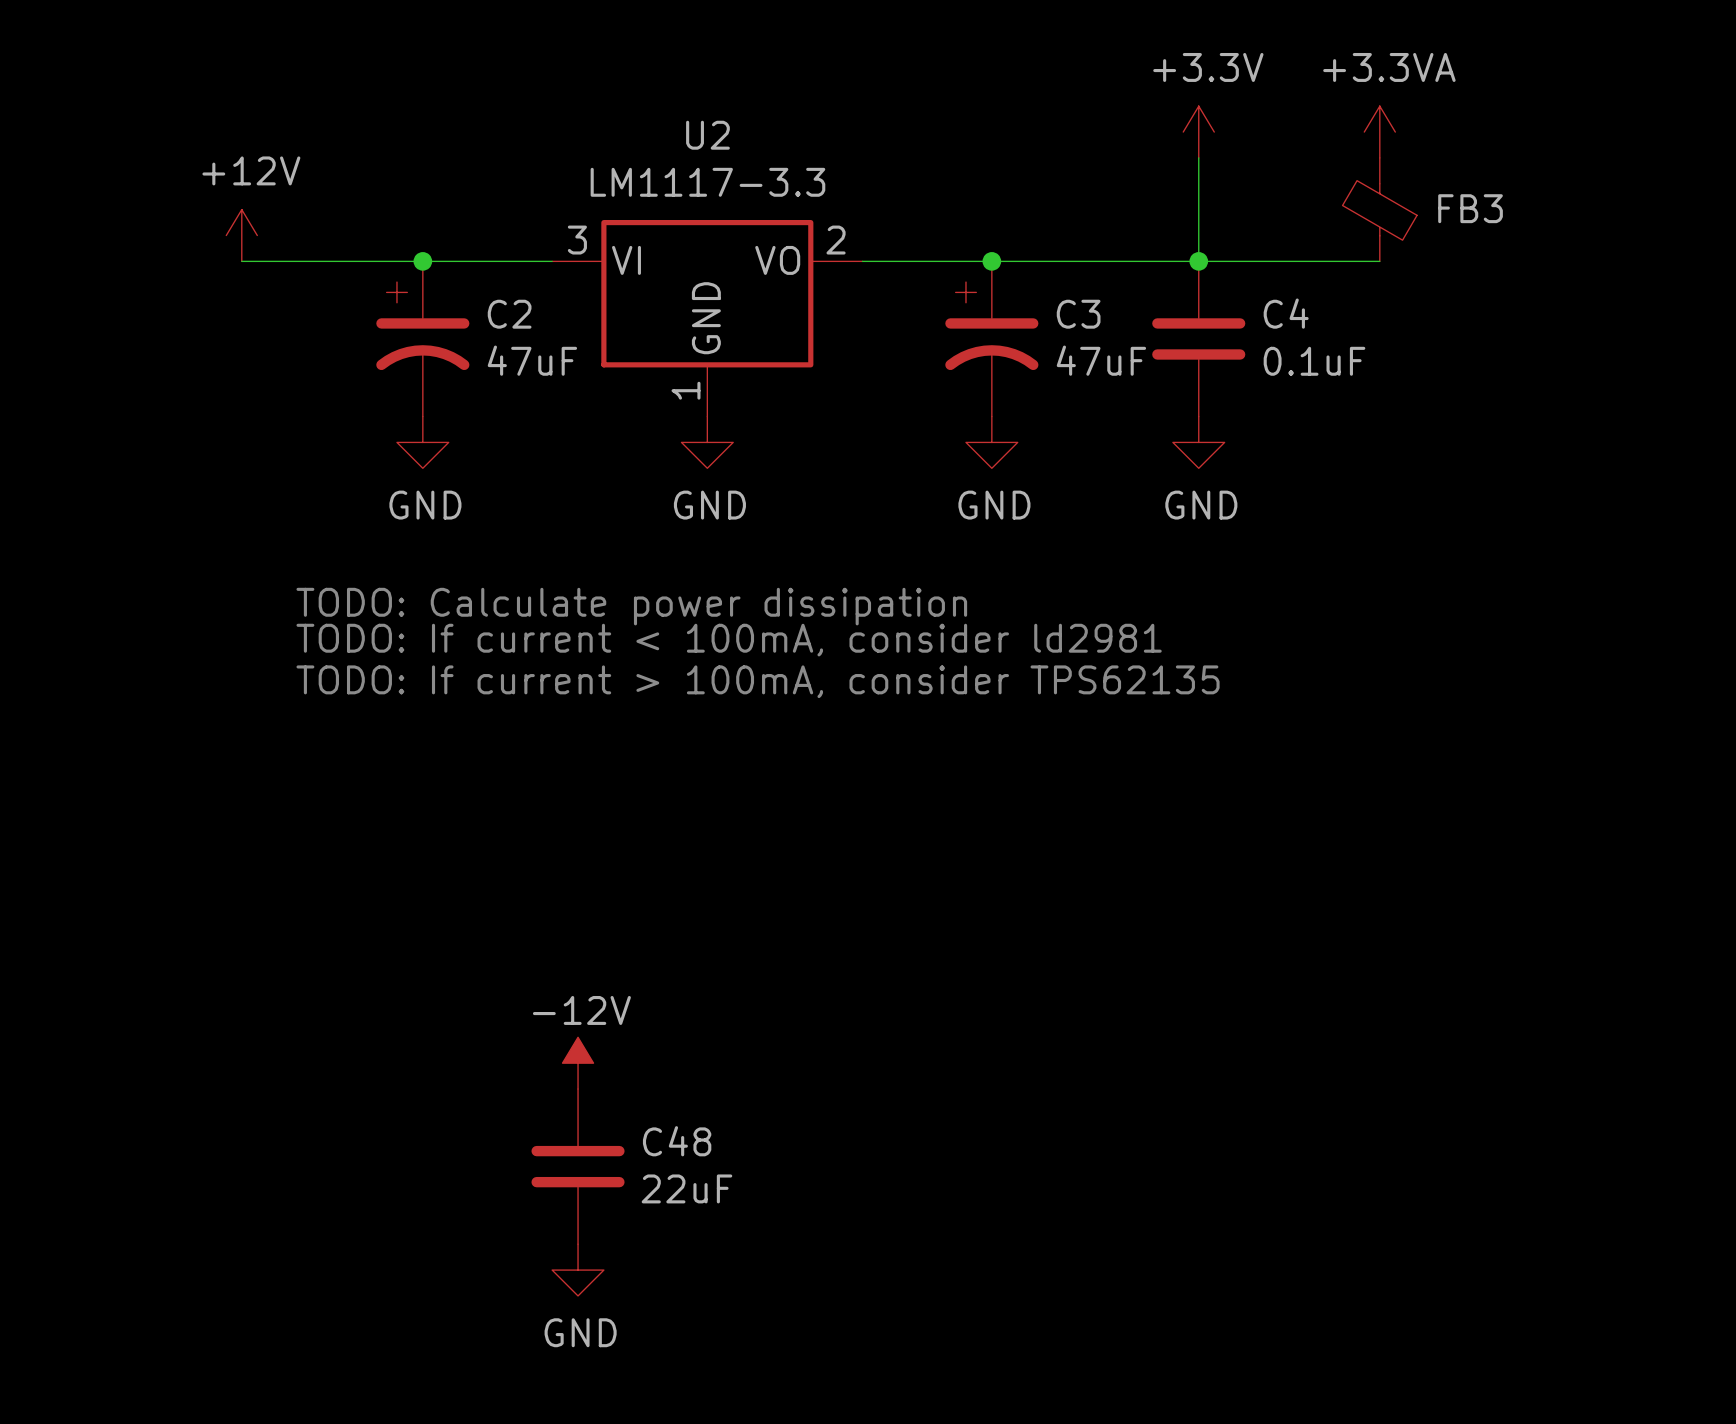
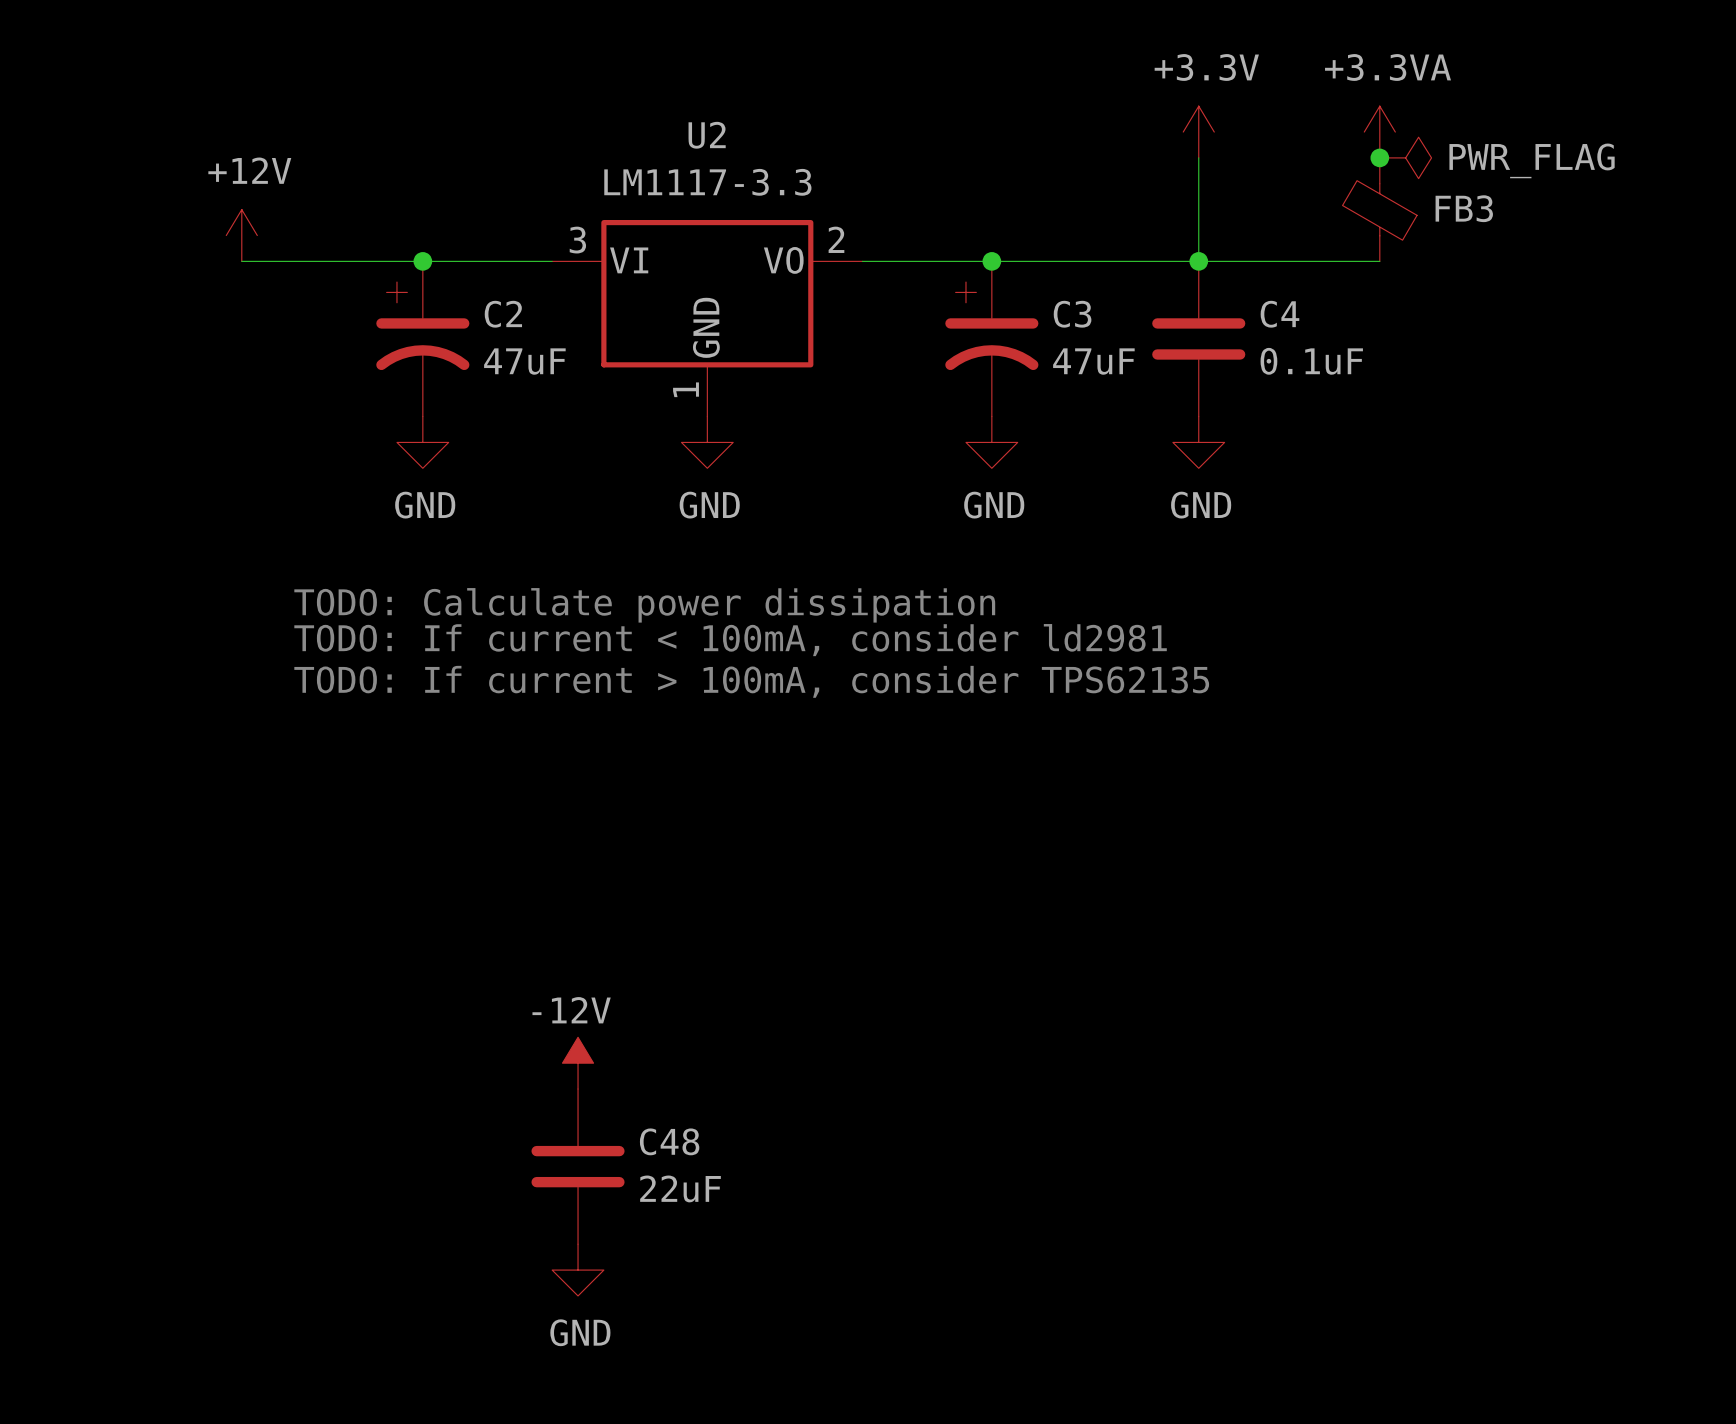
junction: none -> (1379, 157)
power symbol: none -> PWR_FLAG (1405, 157)

